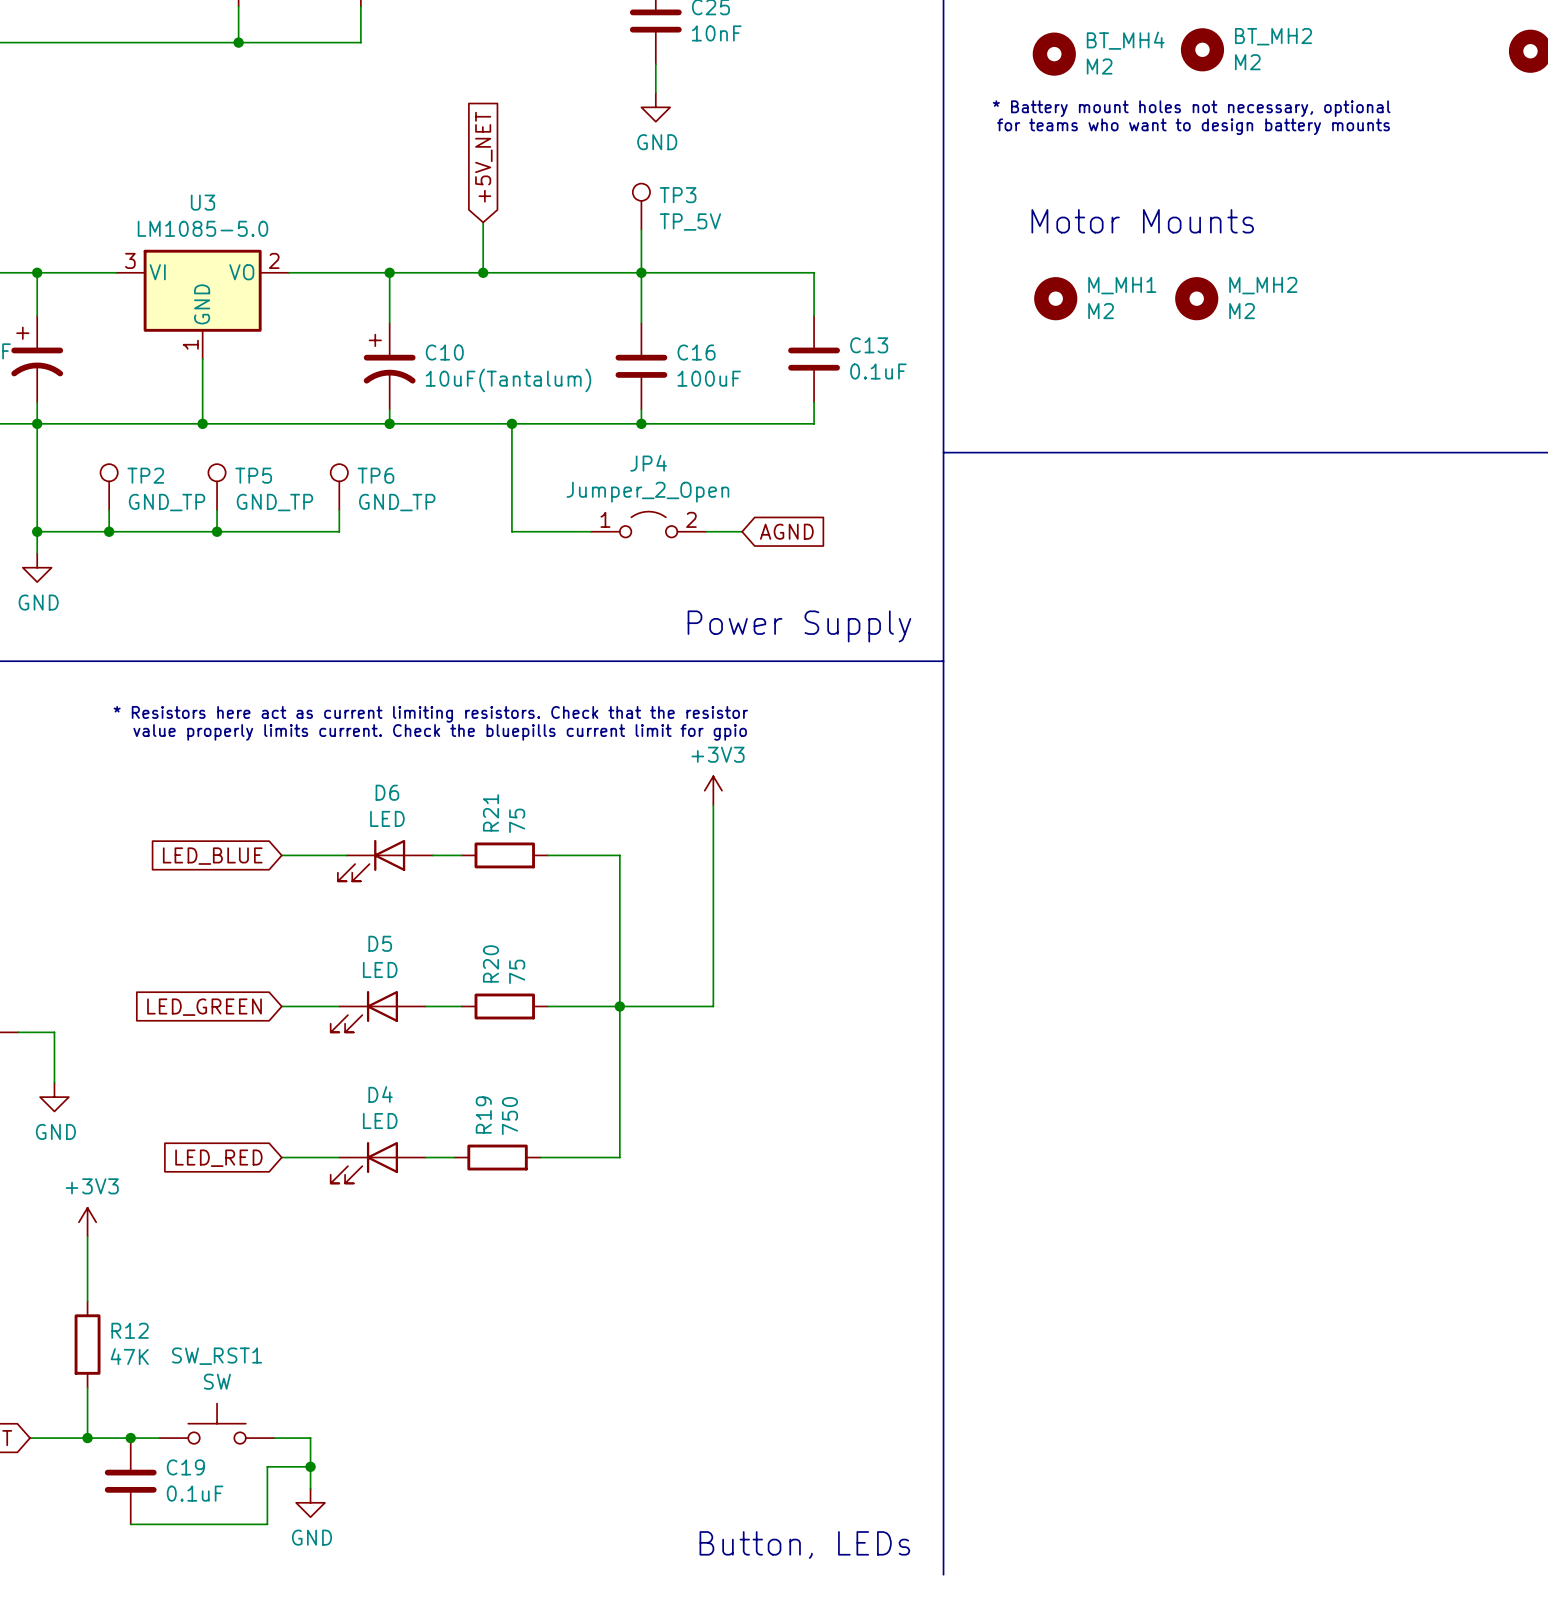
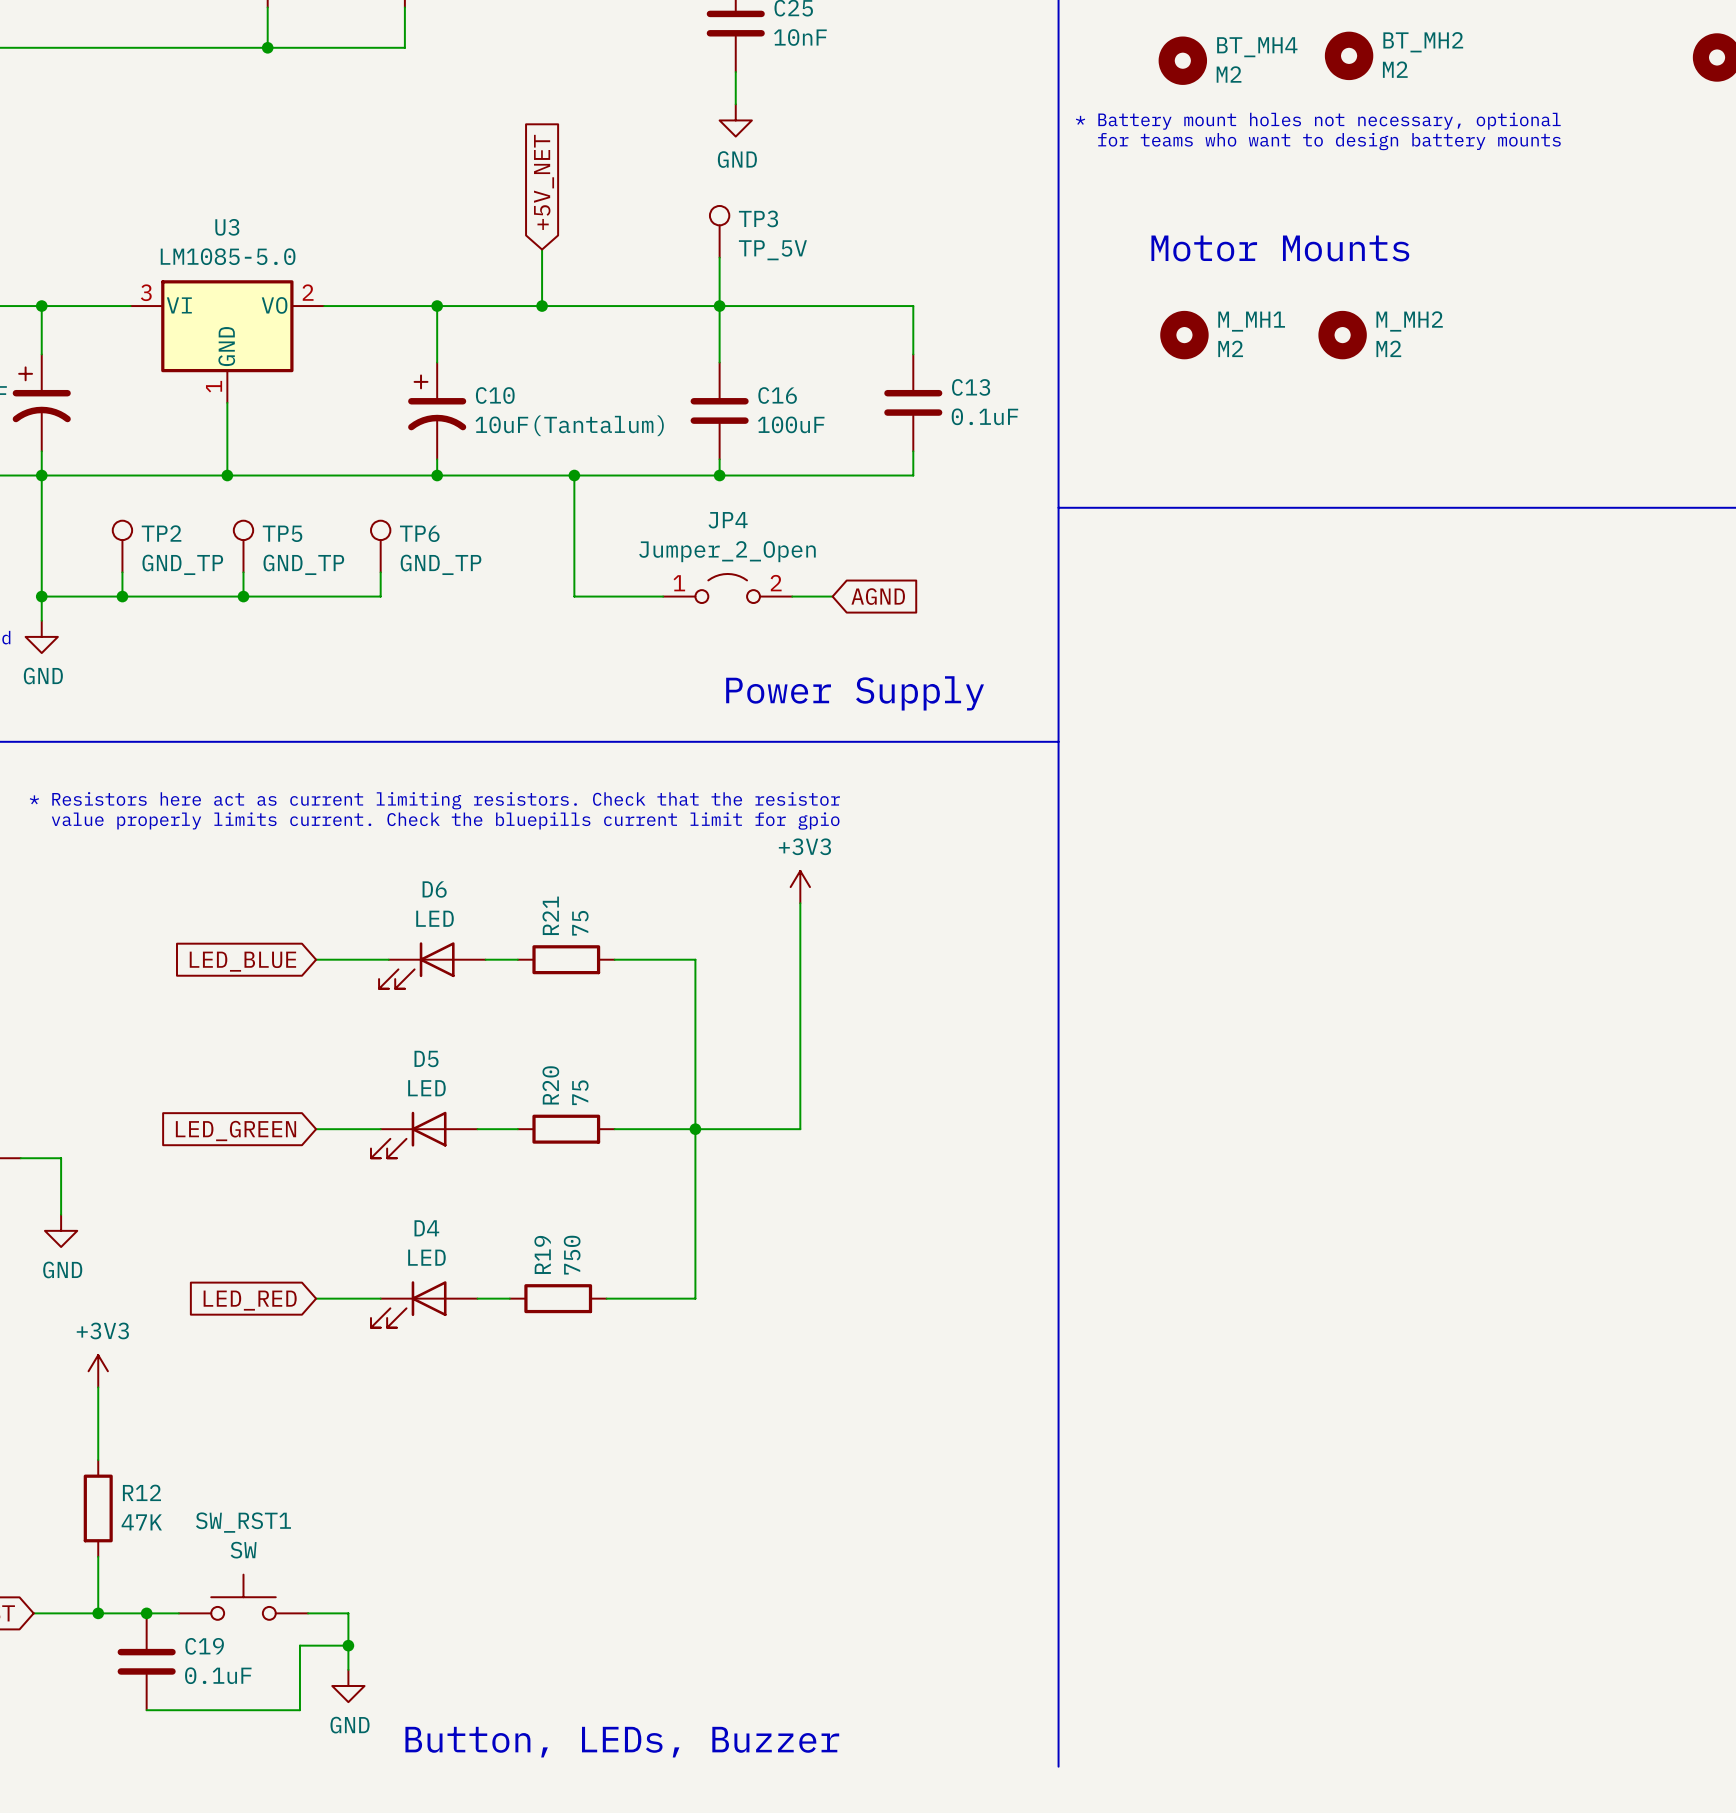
text position: Power Supply (799, 626) -> Power Supply (855, 693)
text: Button, LEDs (804, 1544) -> Button, LEDs, Buzzer (622, 1742)

